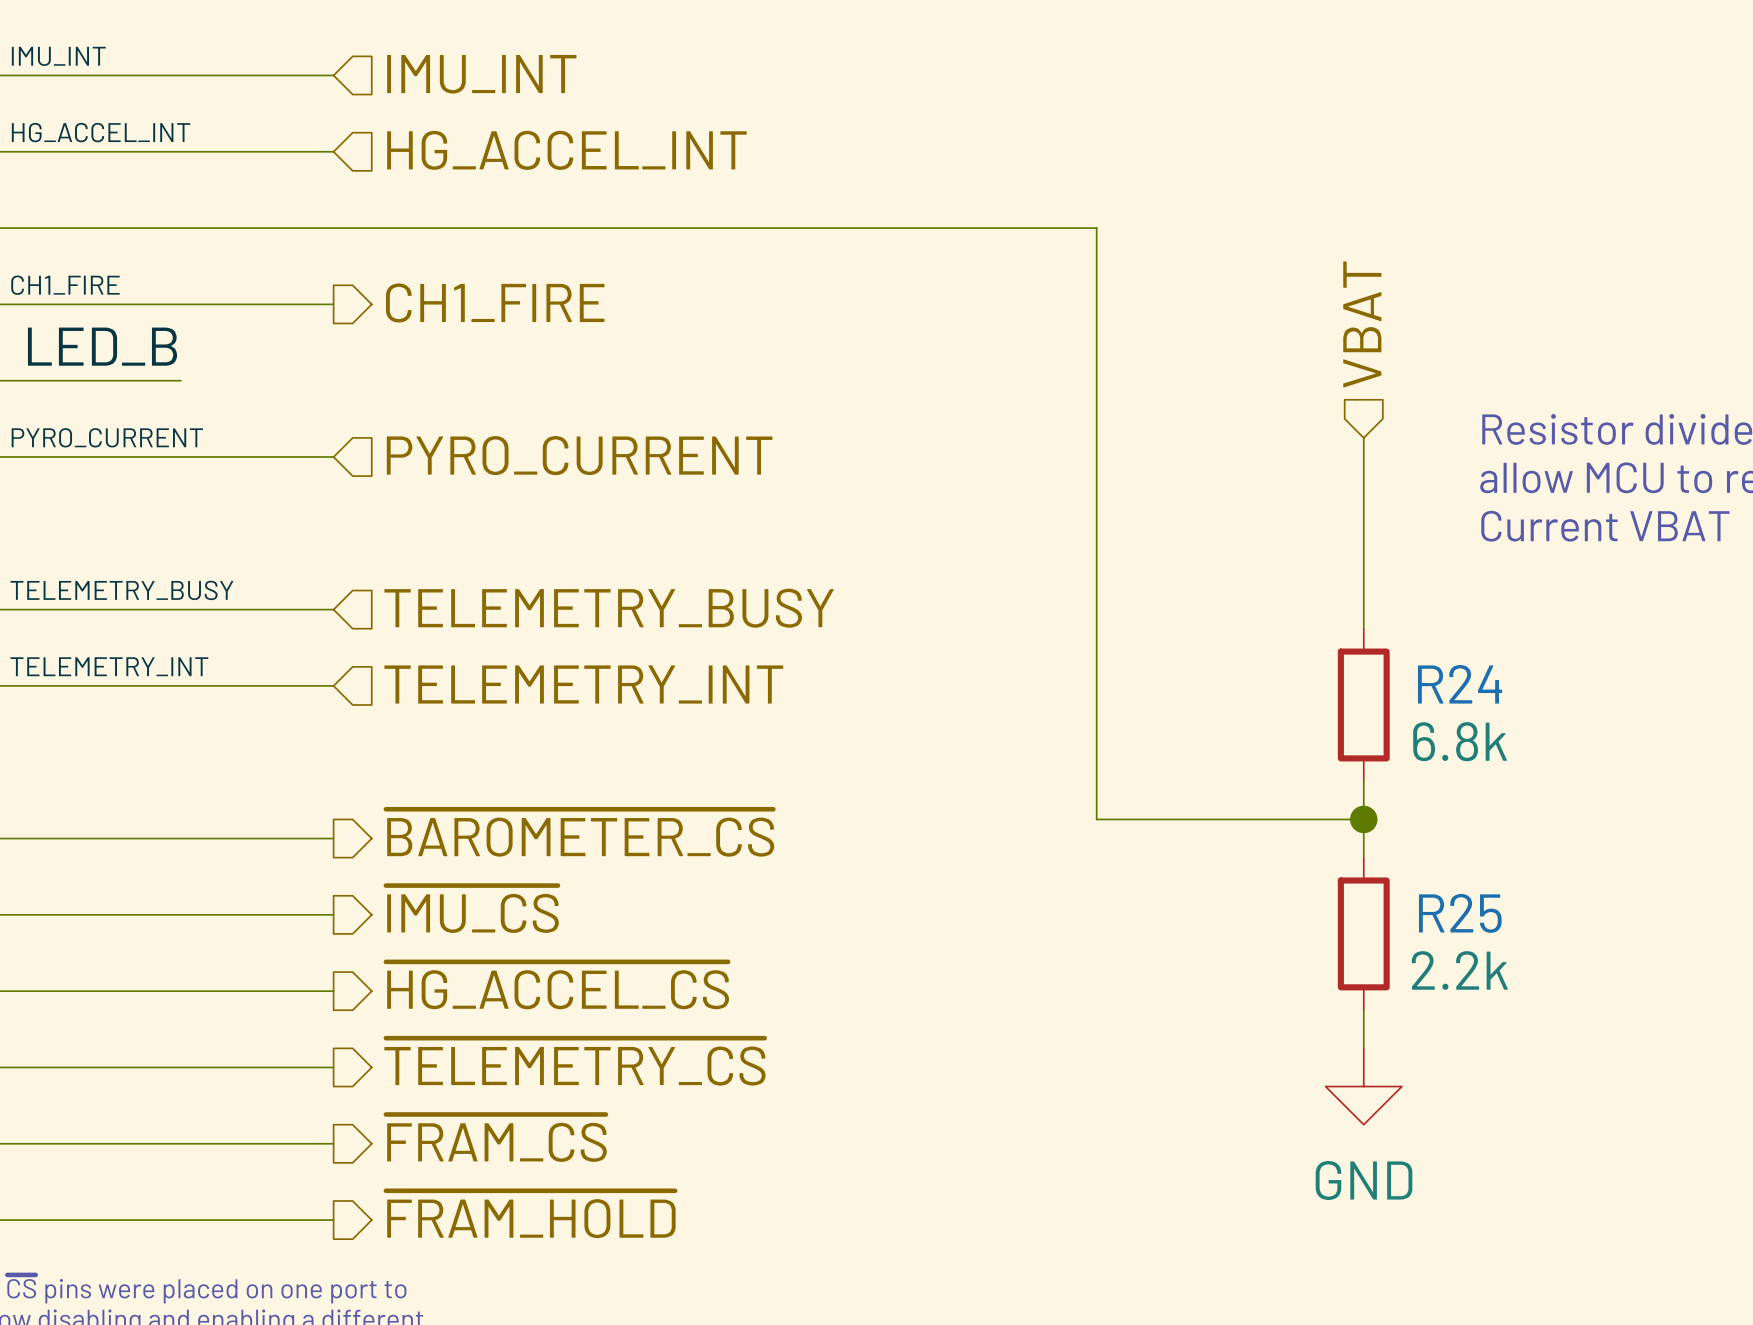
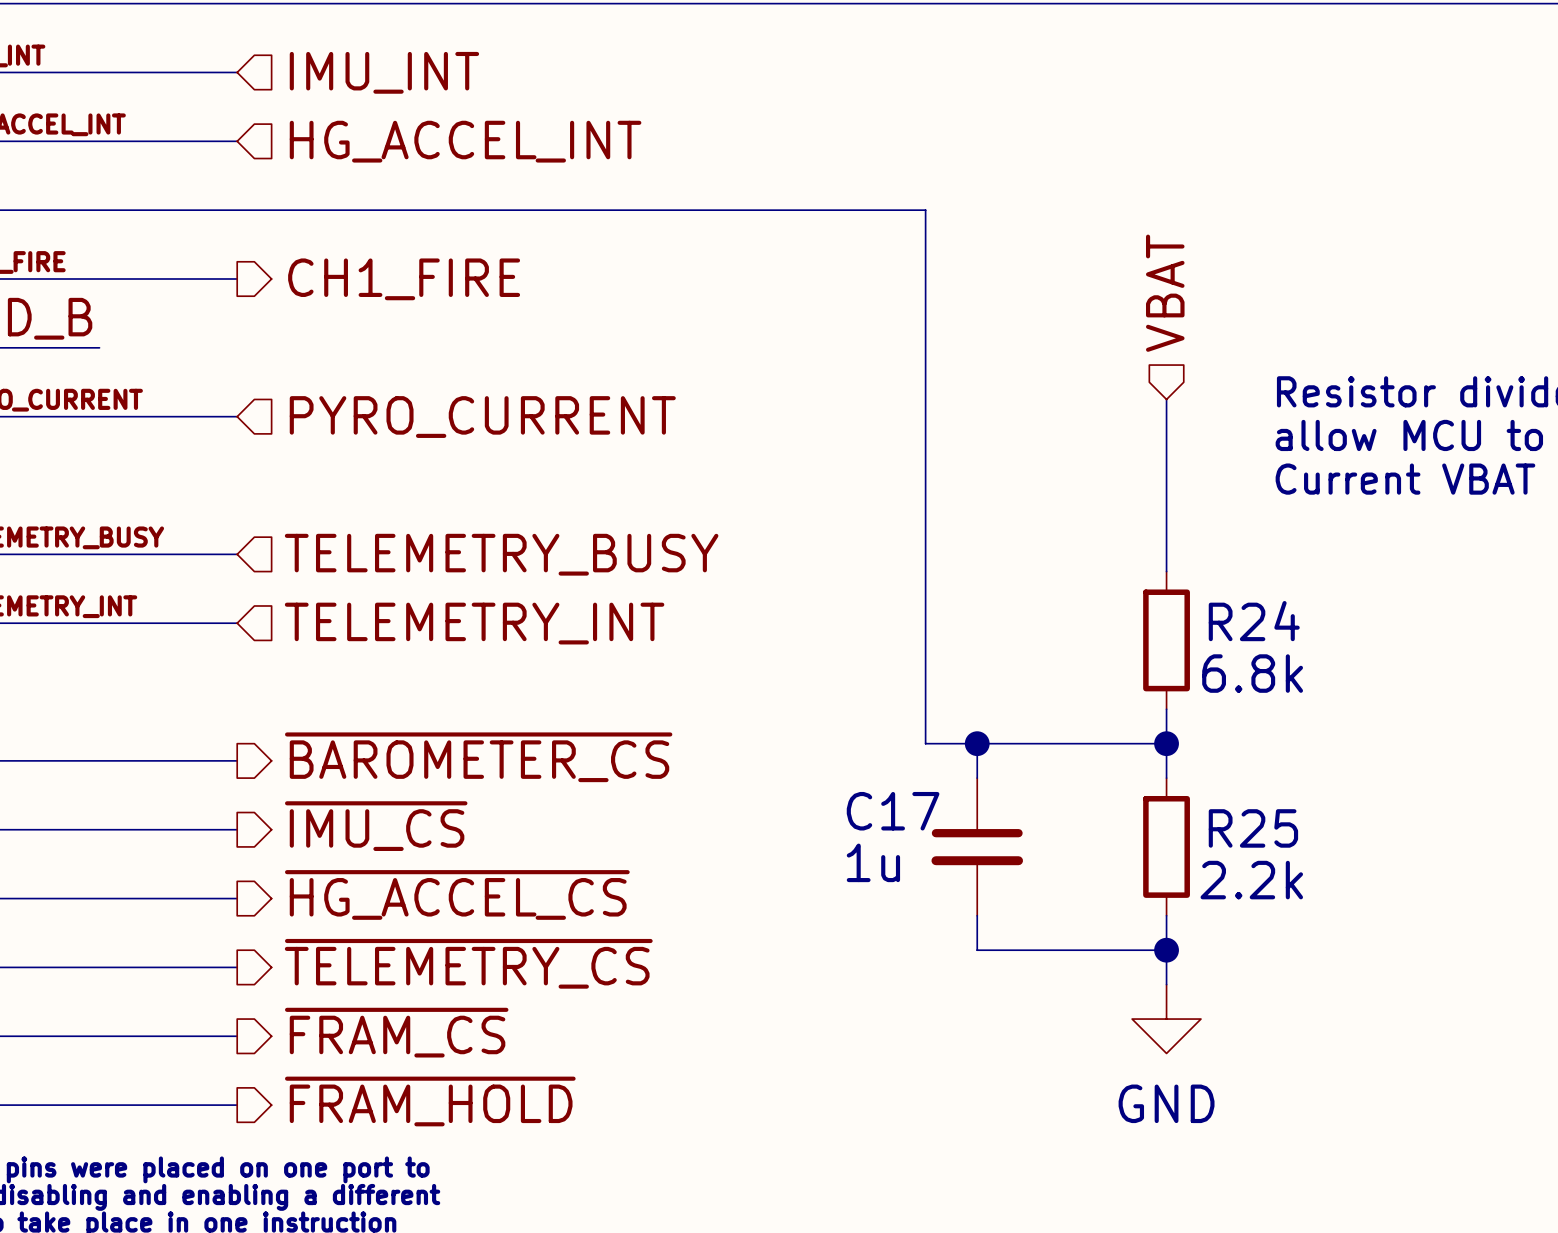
wire: none -> (977, 743) (977, 778)
junction: none -> (977, 743)
C17: none -> 1u (977, 846)
wire: none -> (977, 915) (977, 950) (1166, 950) (1166, 984)
junction: none -> (1166, 950)
power symbol position: GND (1363, 1086) -> GND (1166, 1019)

